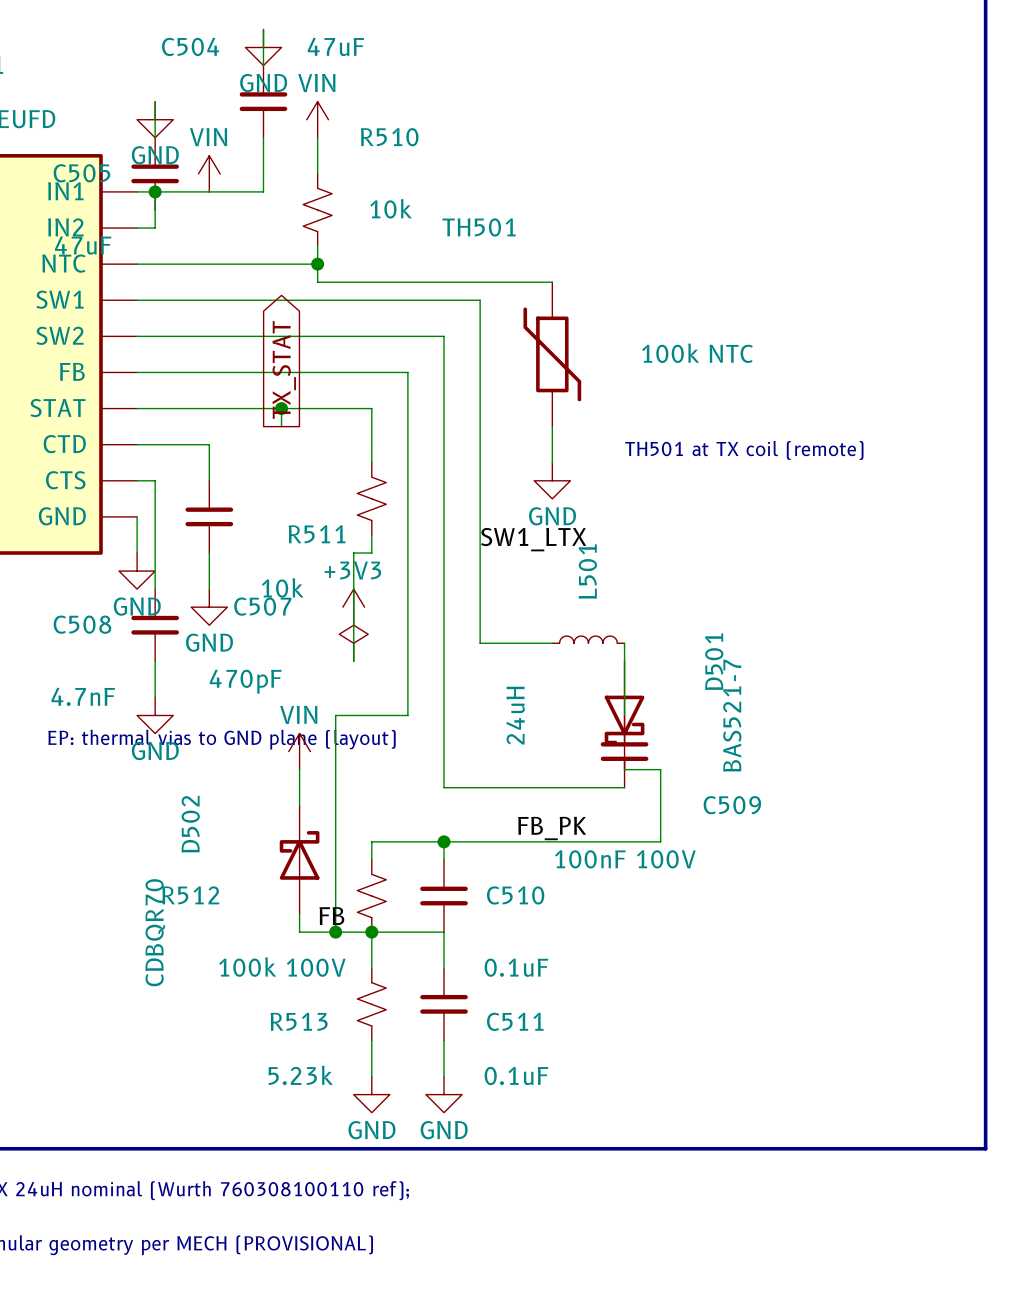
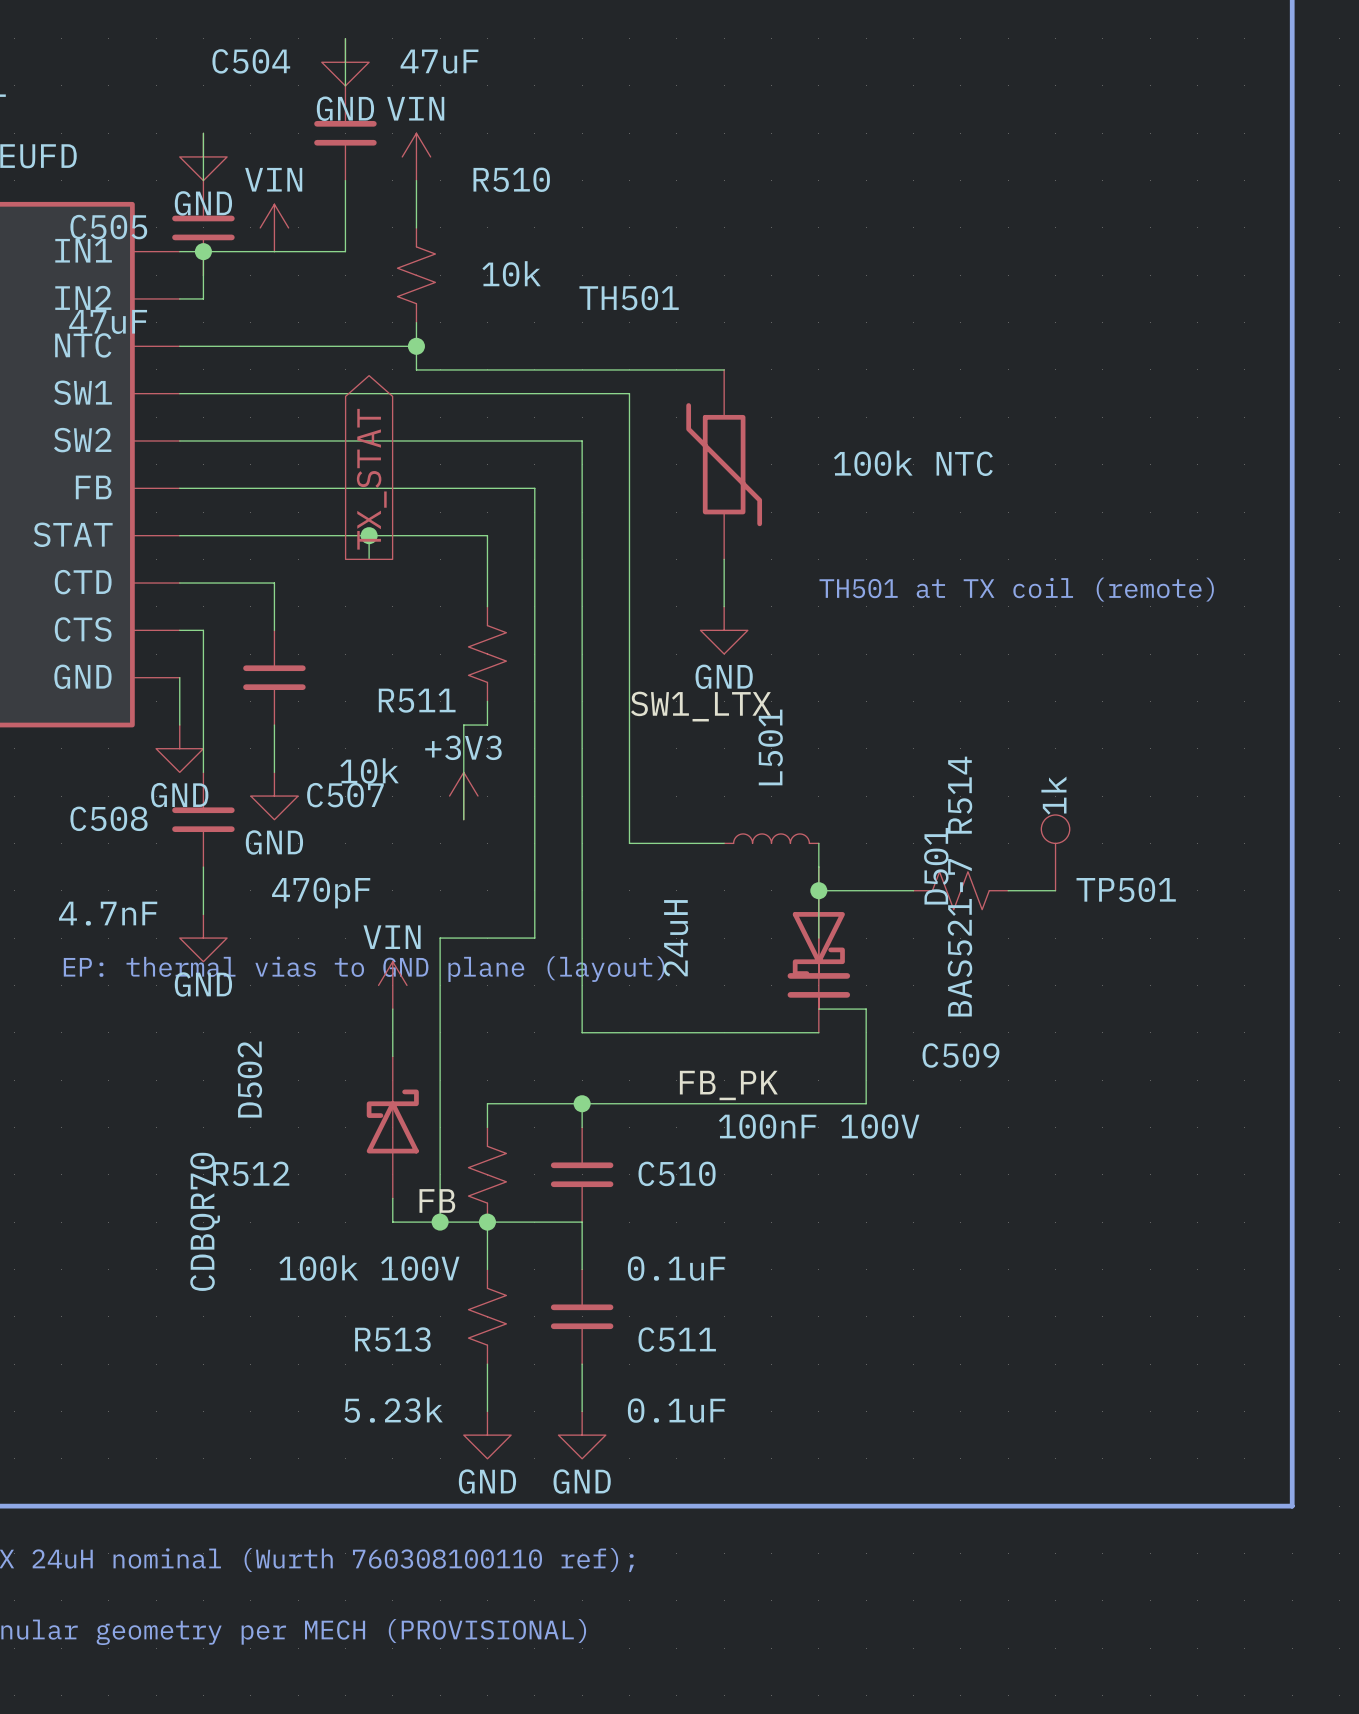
wire: (353, 625) (353, 661) -> none
power symbol: (353, 643) -> none
part: none -> TP501 (1055, 852)
wire: none -> (818, 890) (913, 890)
junction: none -> (818, 890)
R514: none -> 1k (960, 890)
wire: none -> (1008, 890) (1055, 890)

